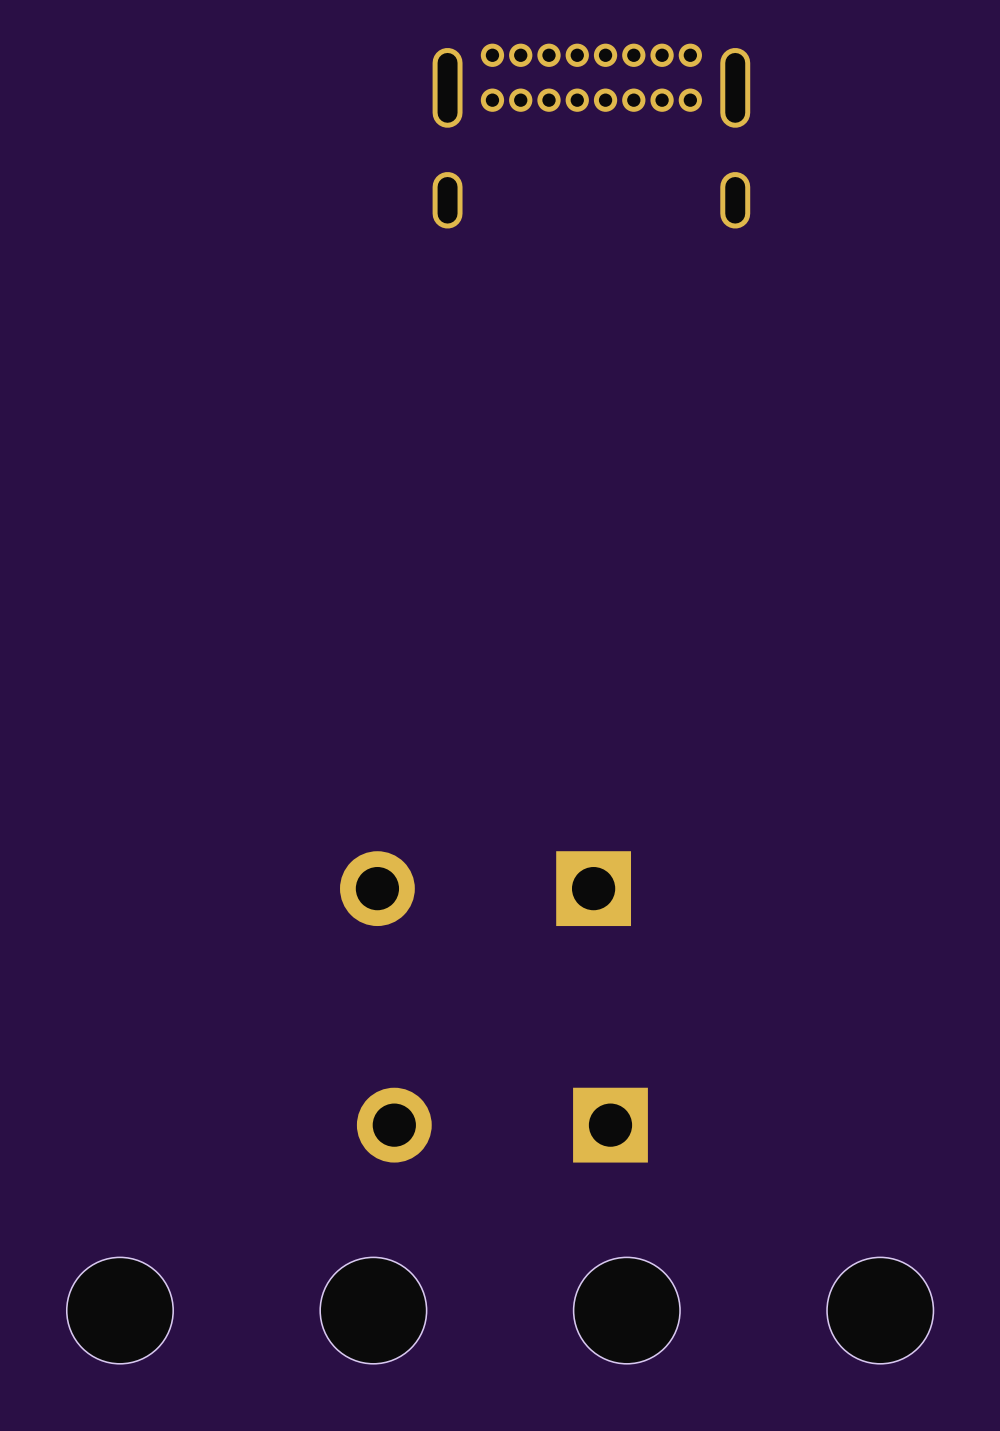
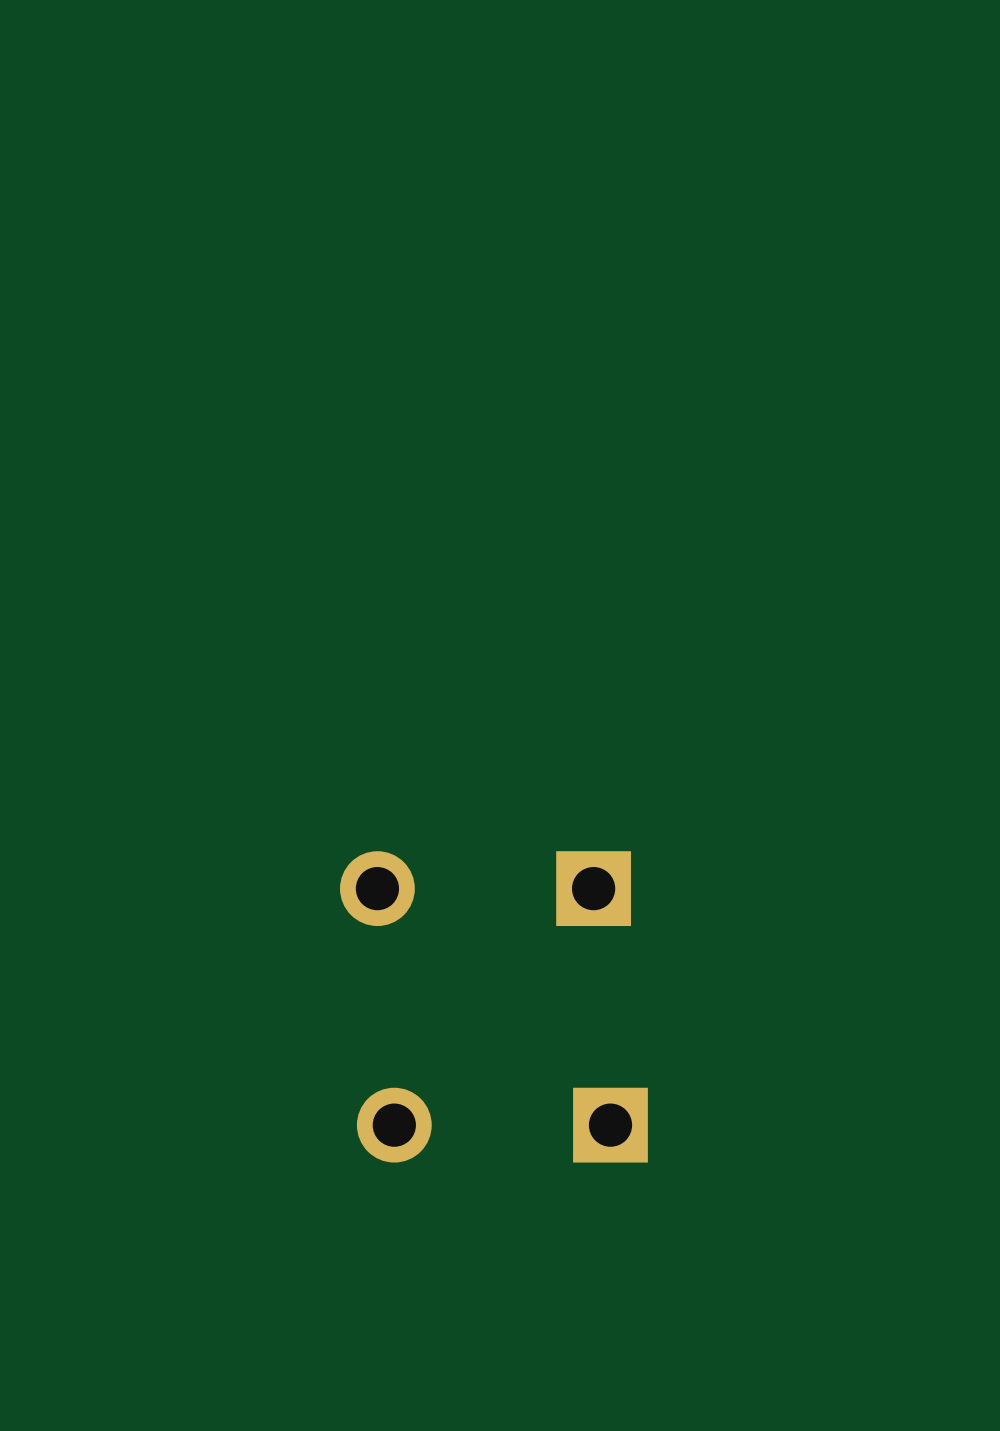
part: (591, 136) -> none
part: (119, 1310) -> none
part: (373, 1310) -> none
part: (626, 1310) -> none
part: (880, 1310) -> none

